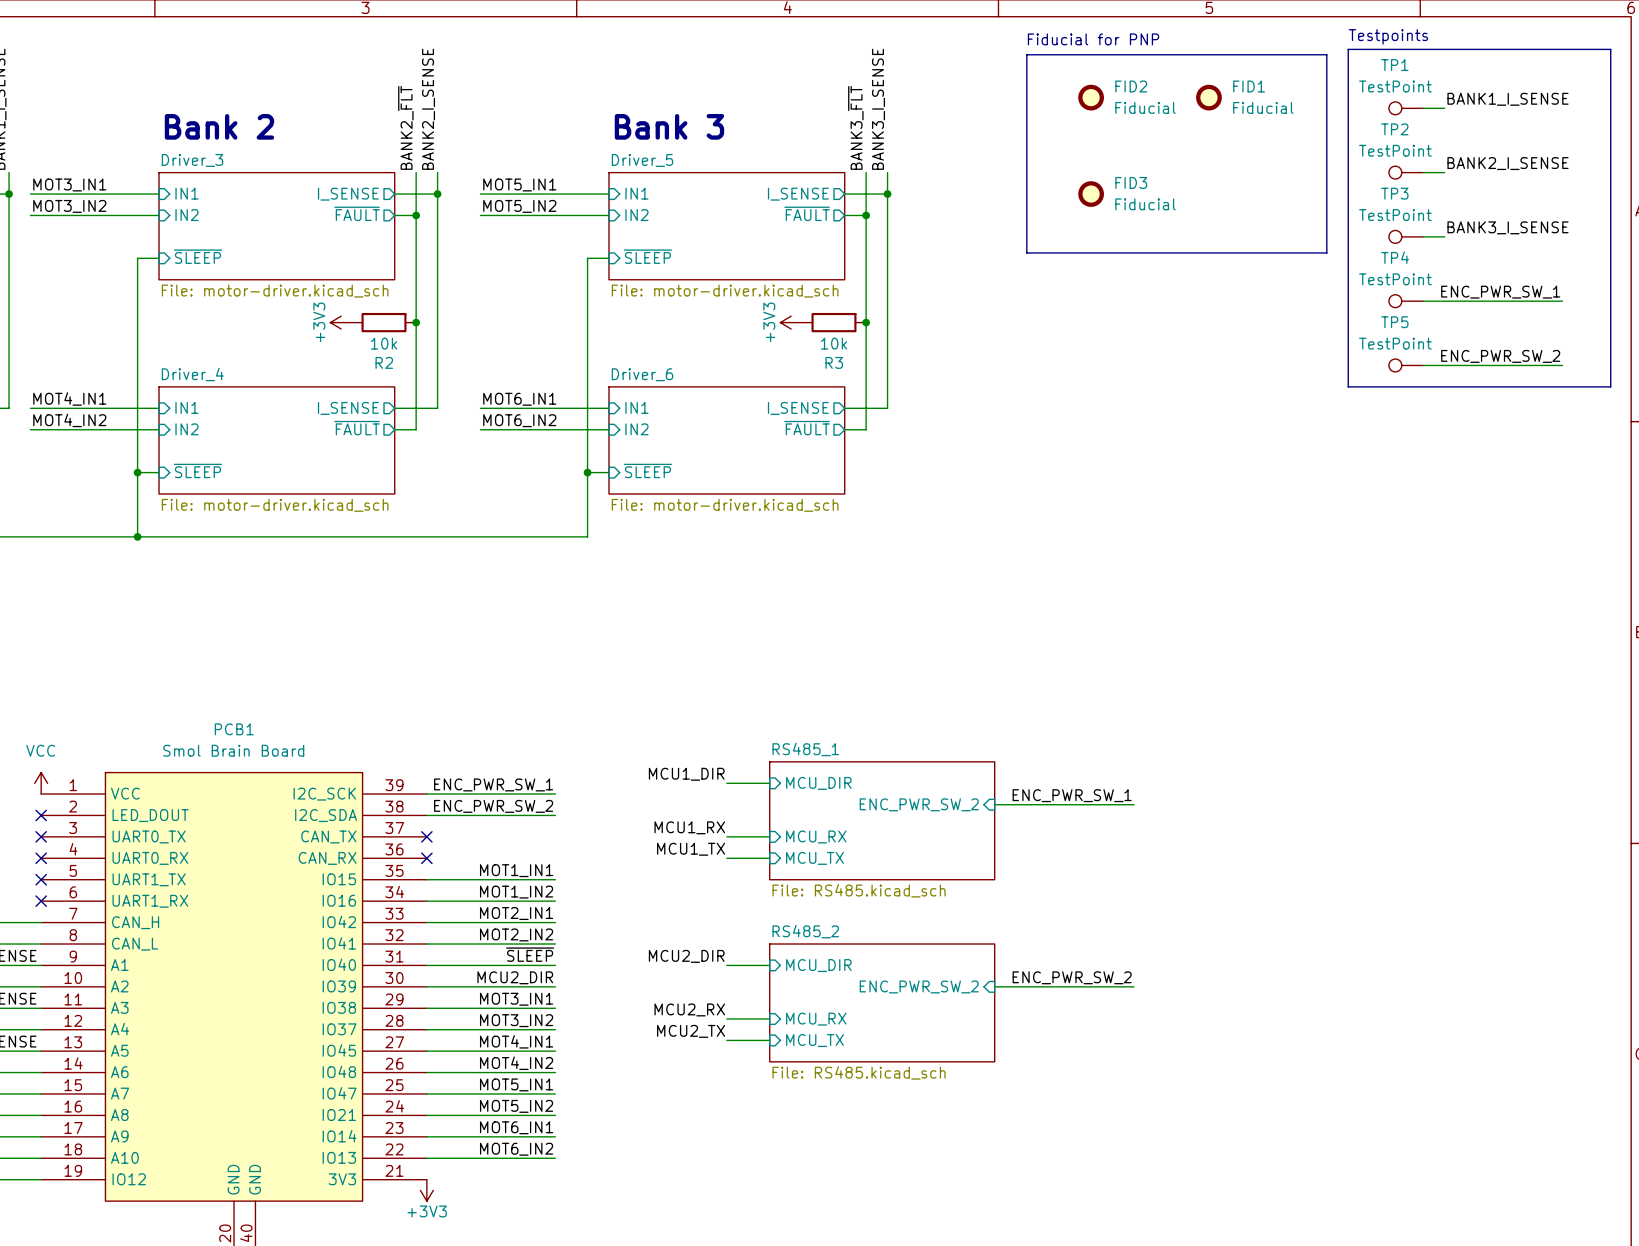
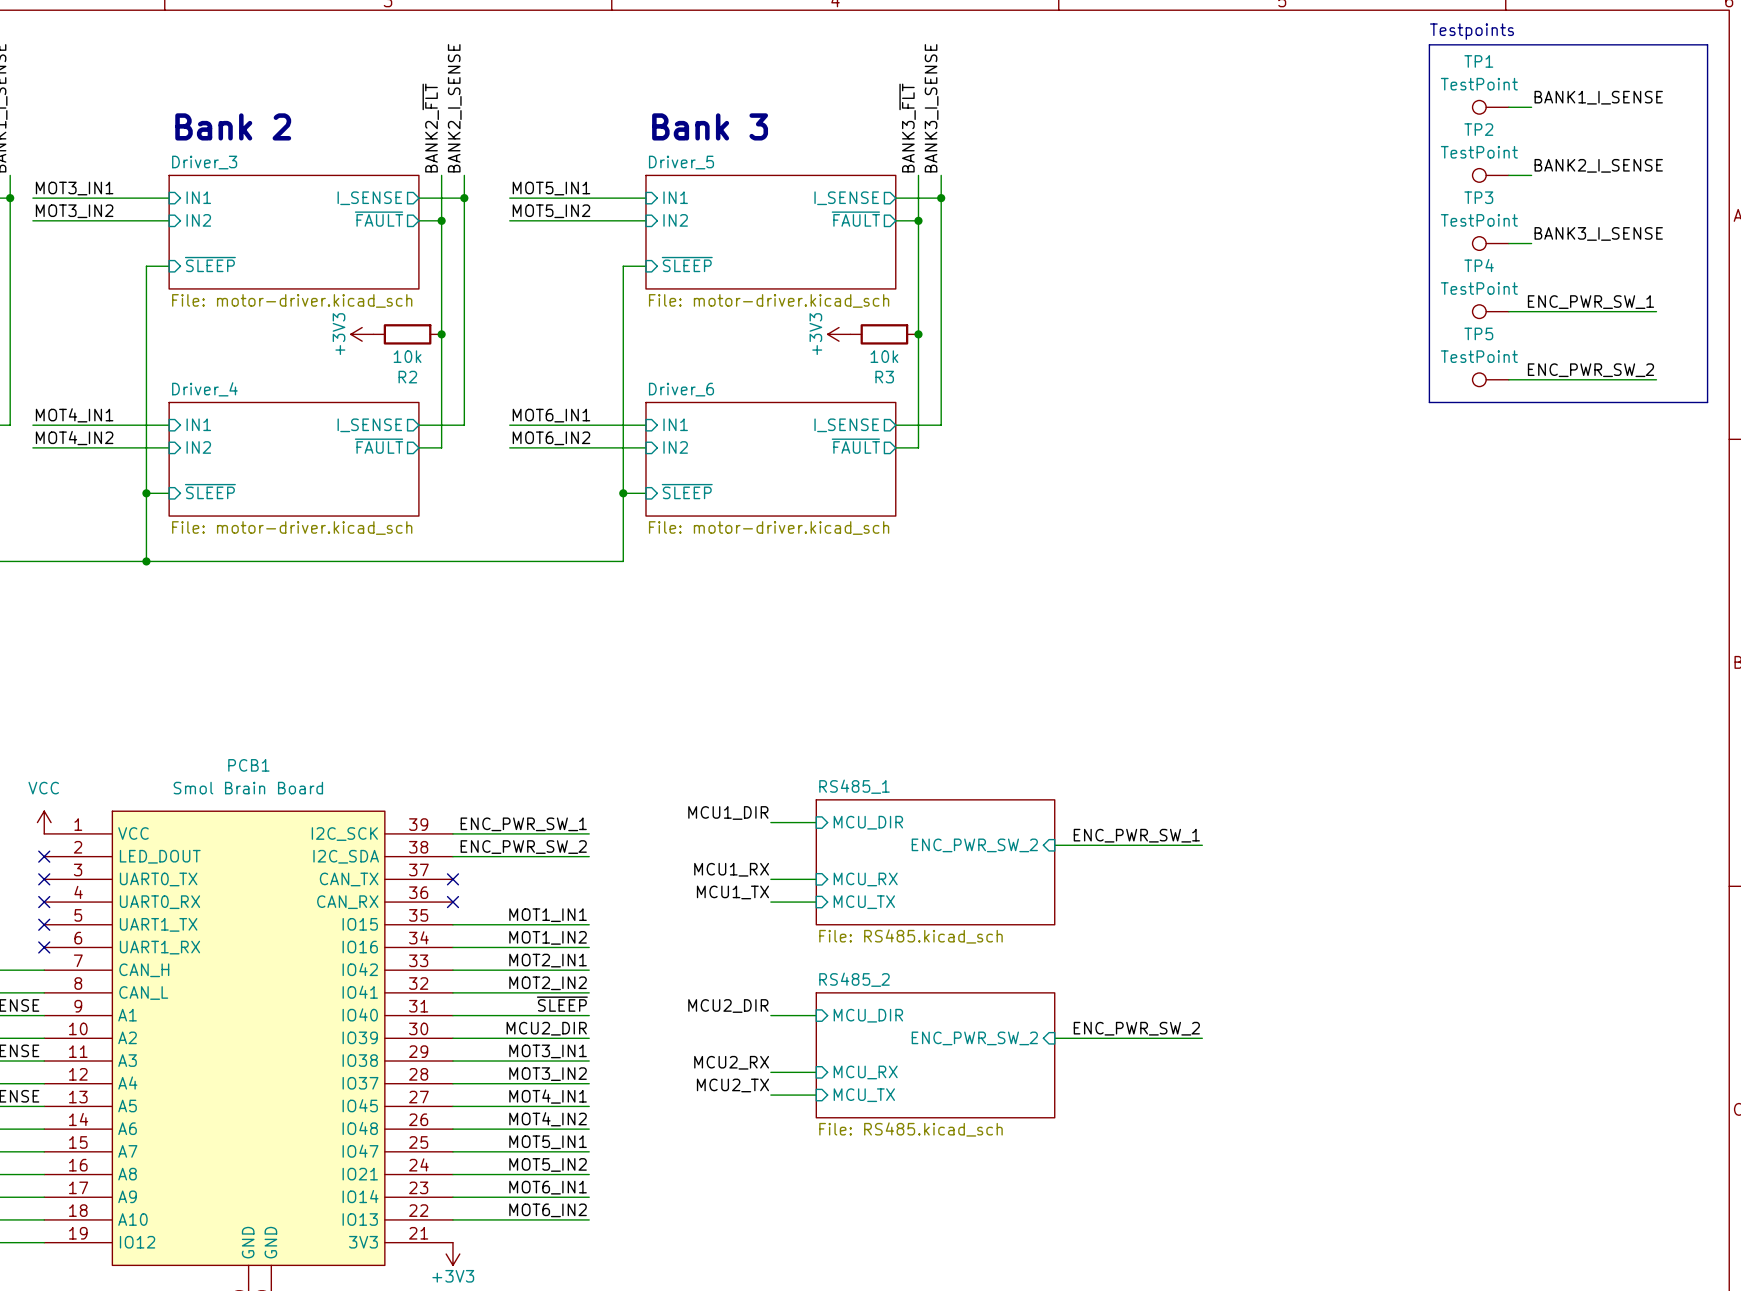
text: Fiducial for PNP (1093, 39) -> none
line: (1026, 54) (1326, 54) (1326, 252) (1026, 252) (1026, 54) -> none
FID2: Fiducial (1091, 97) -> none
FID1: Fiducial (1208, 97) -> none
FID3: Fiducial (1091, 194) -> none

